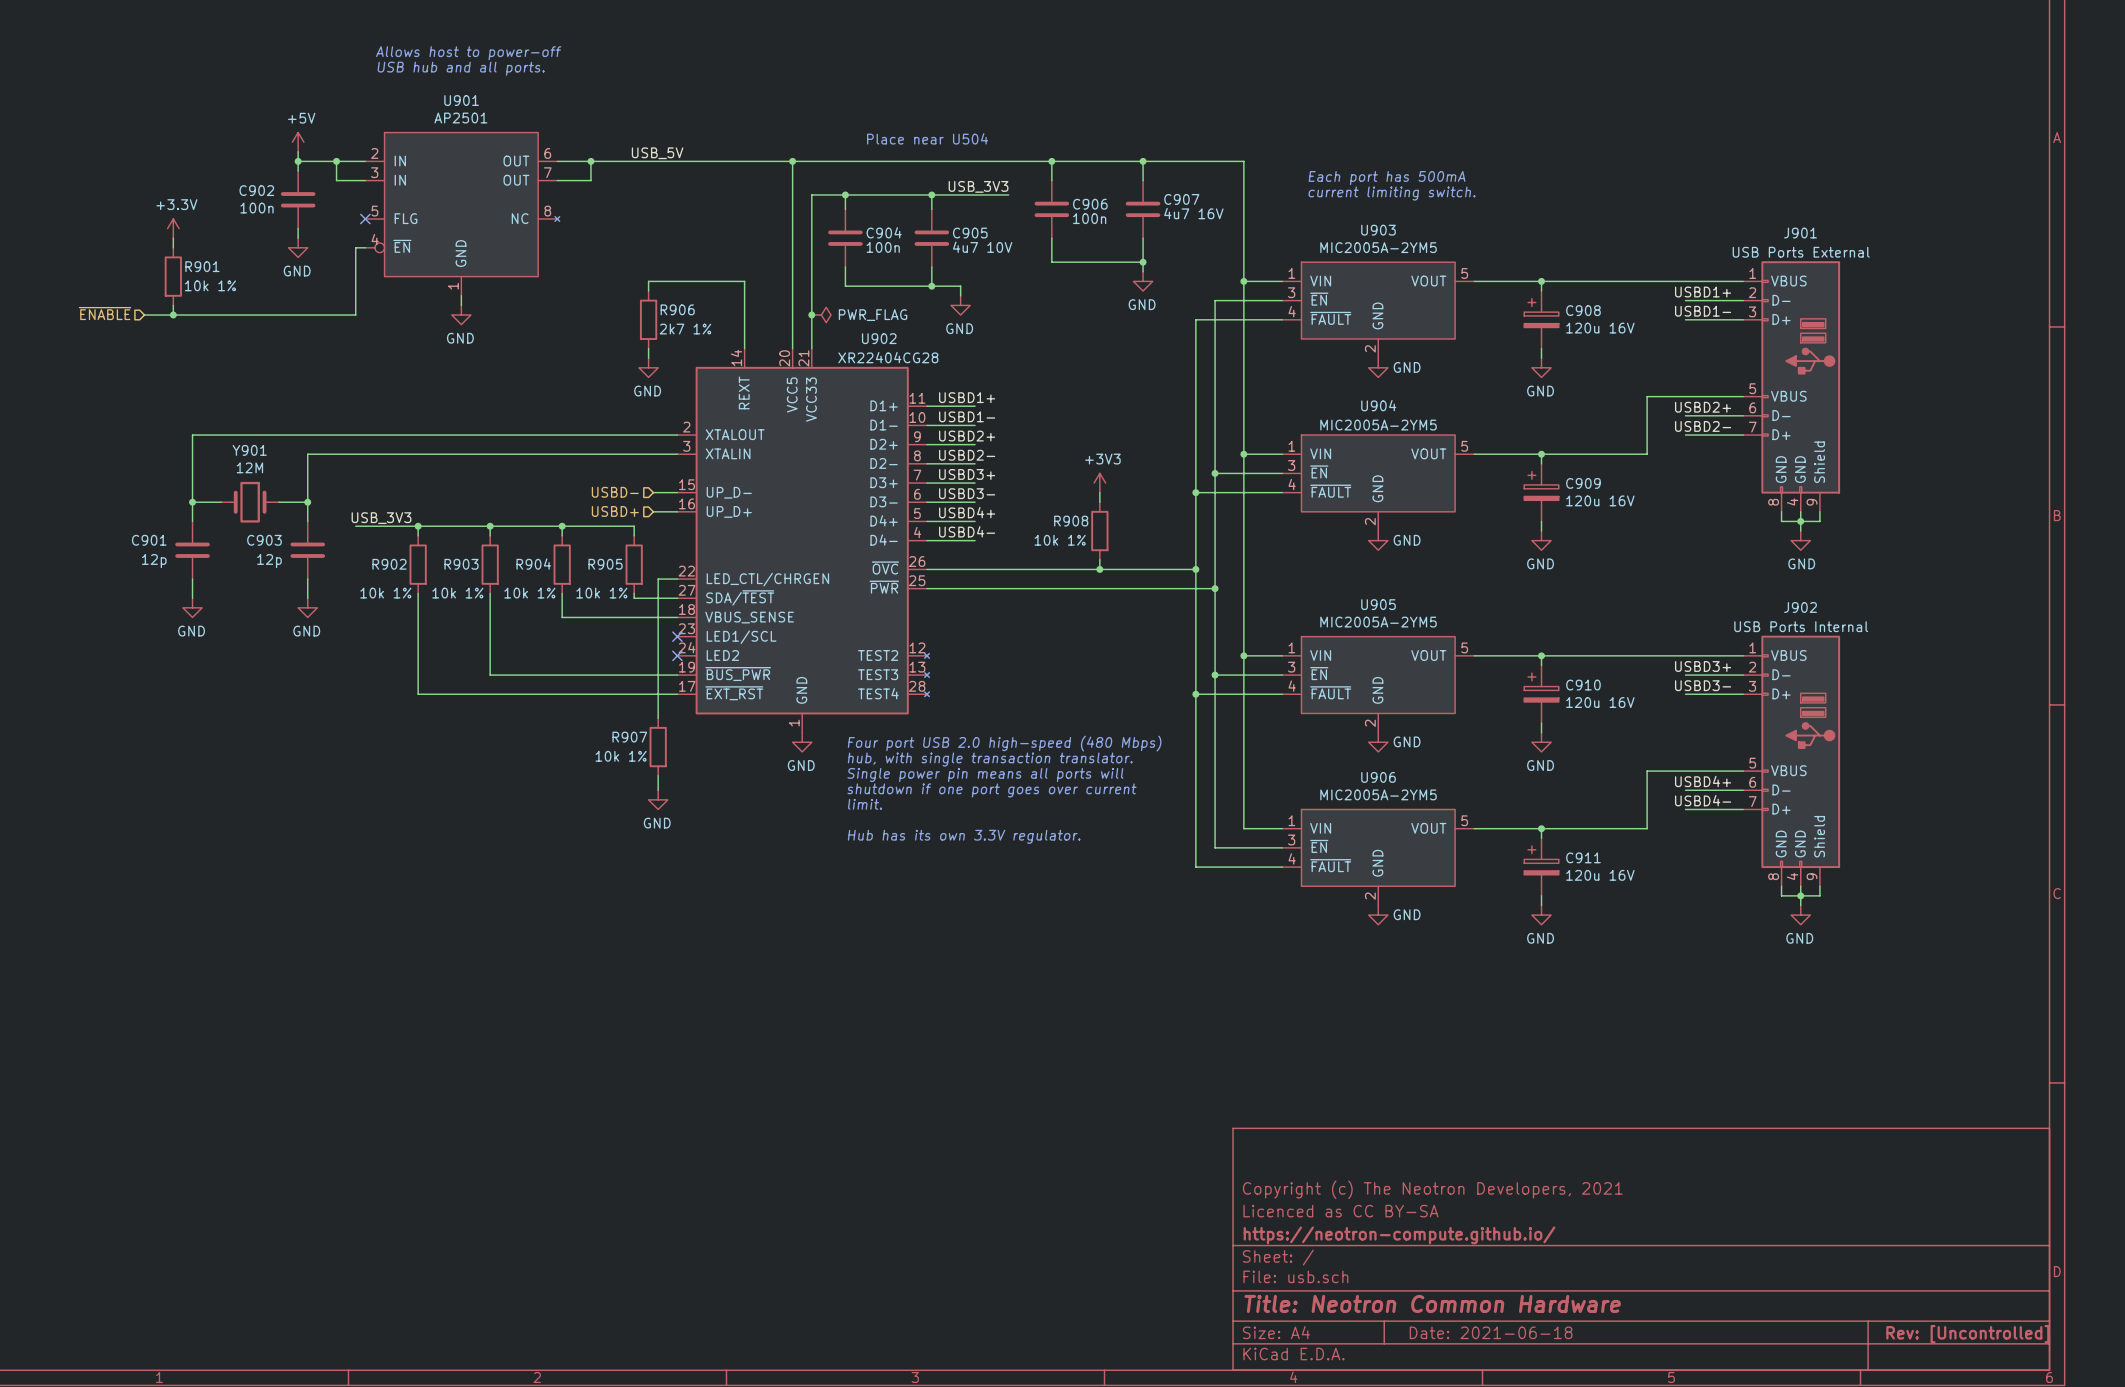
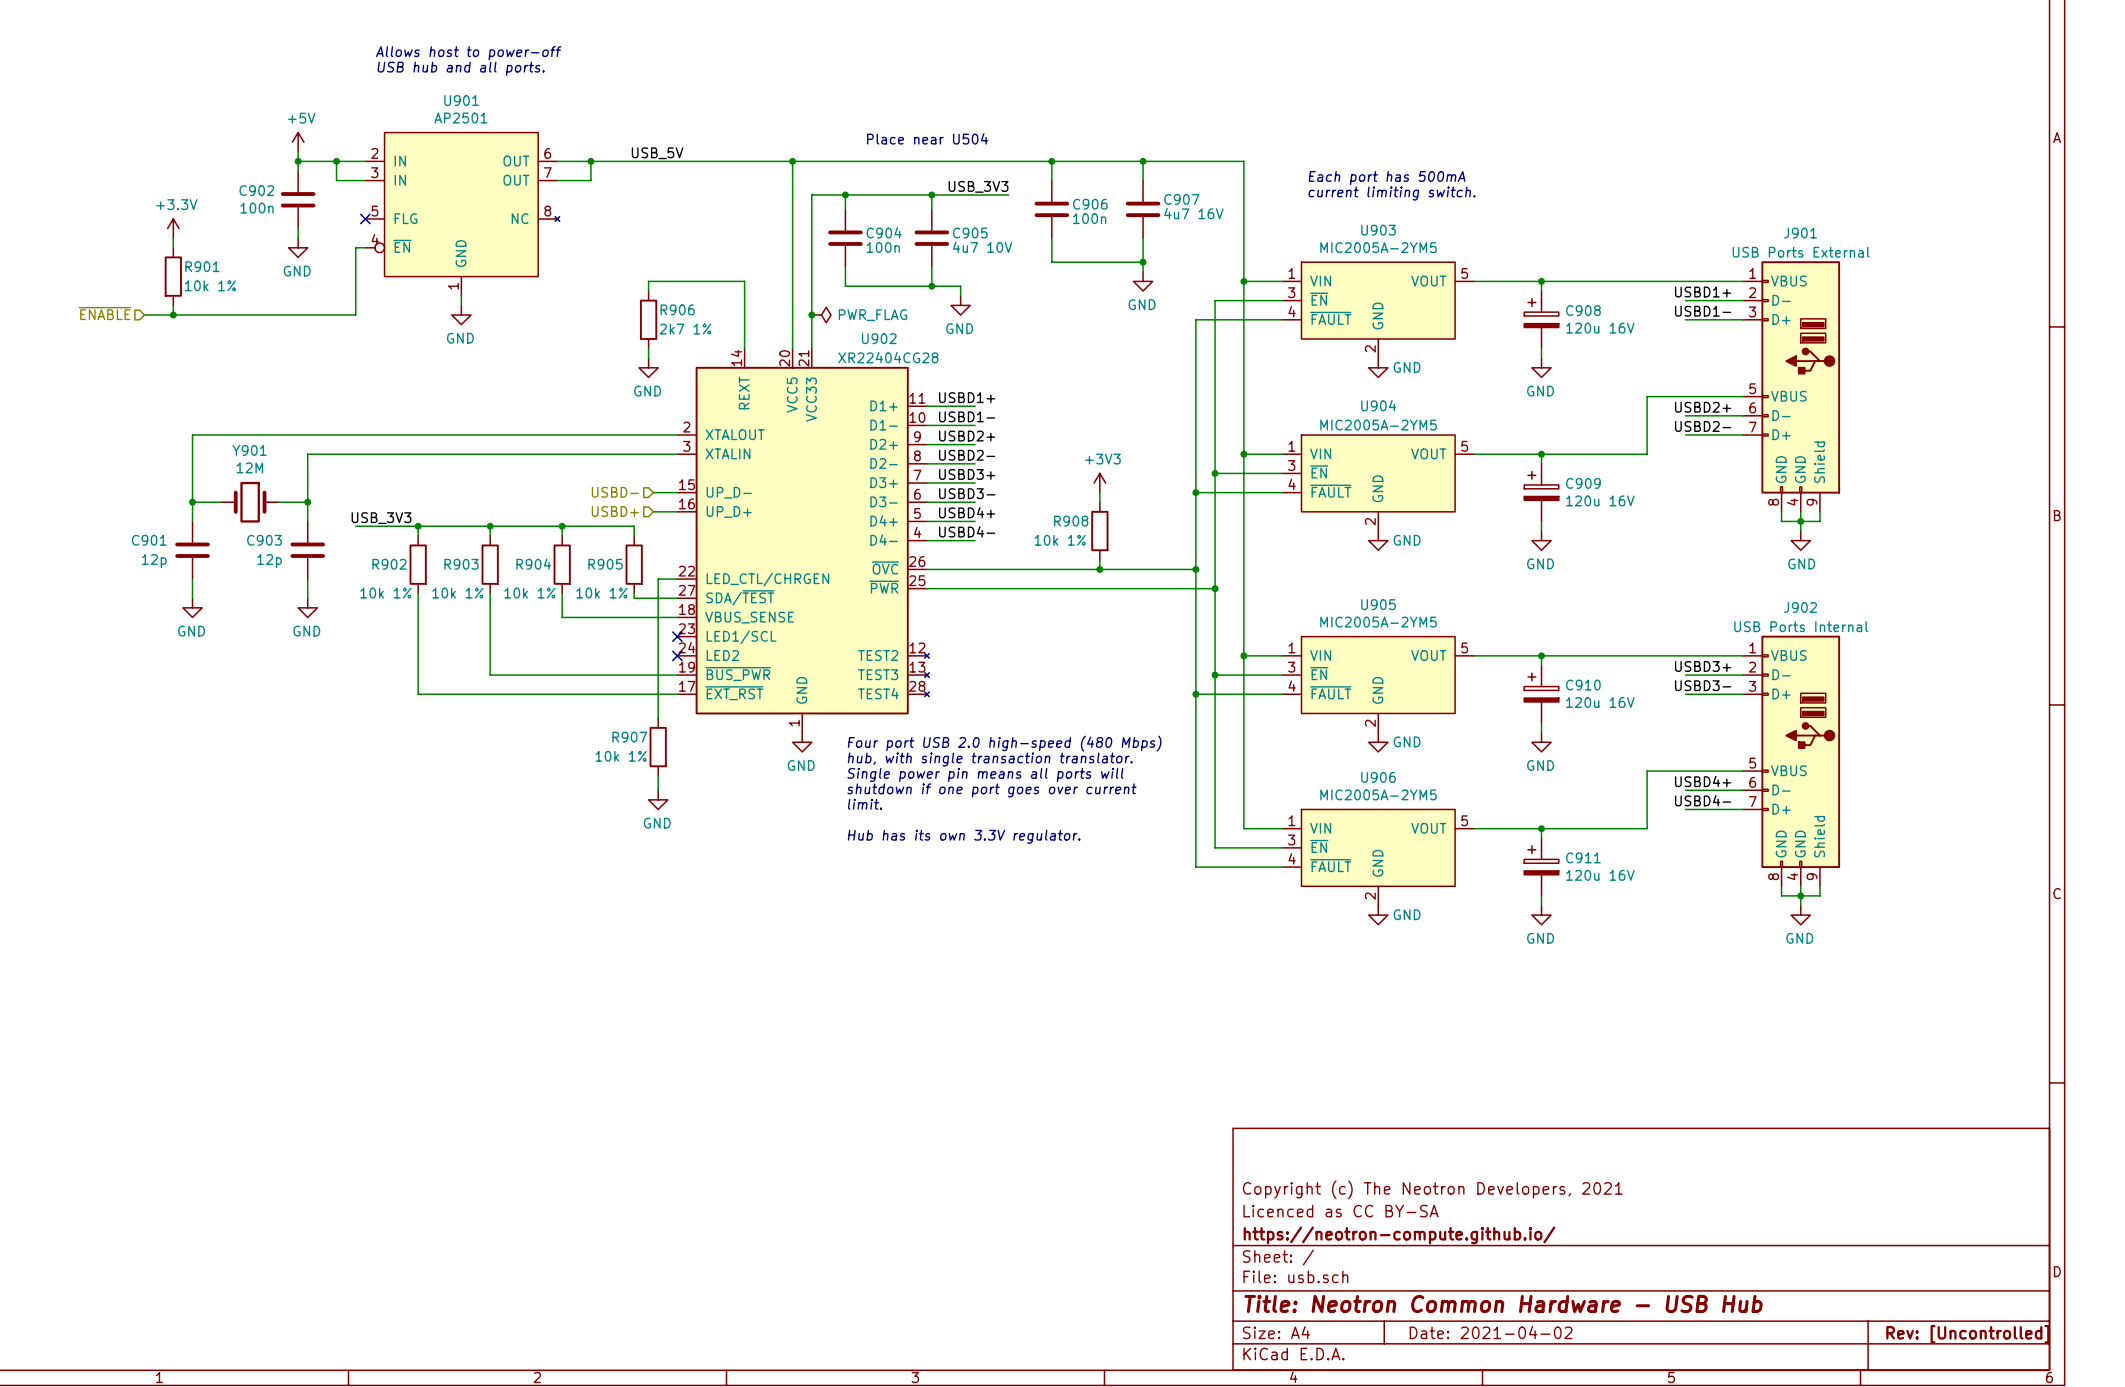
title block: Title: Neotron Common Hardware (1432, 1303) -> Title: Neotron Common Hardware - USB Hub (1503, 1303)
title block: Date: 2021-06-18 (1491, 1332) -> Date: 2021-04-02 (1491, 1332)

